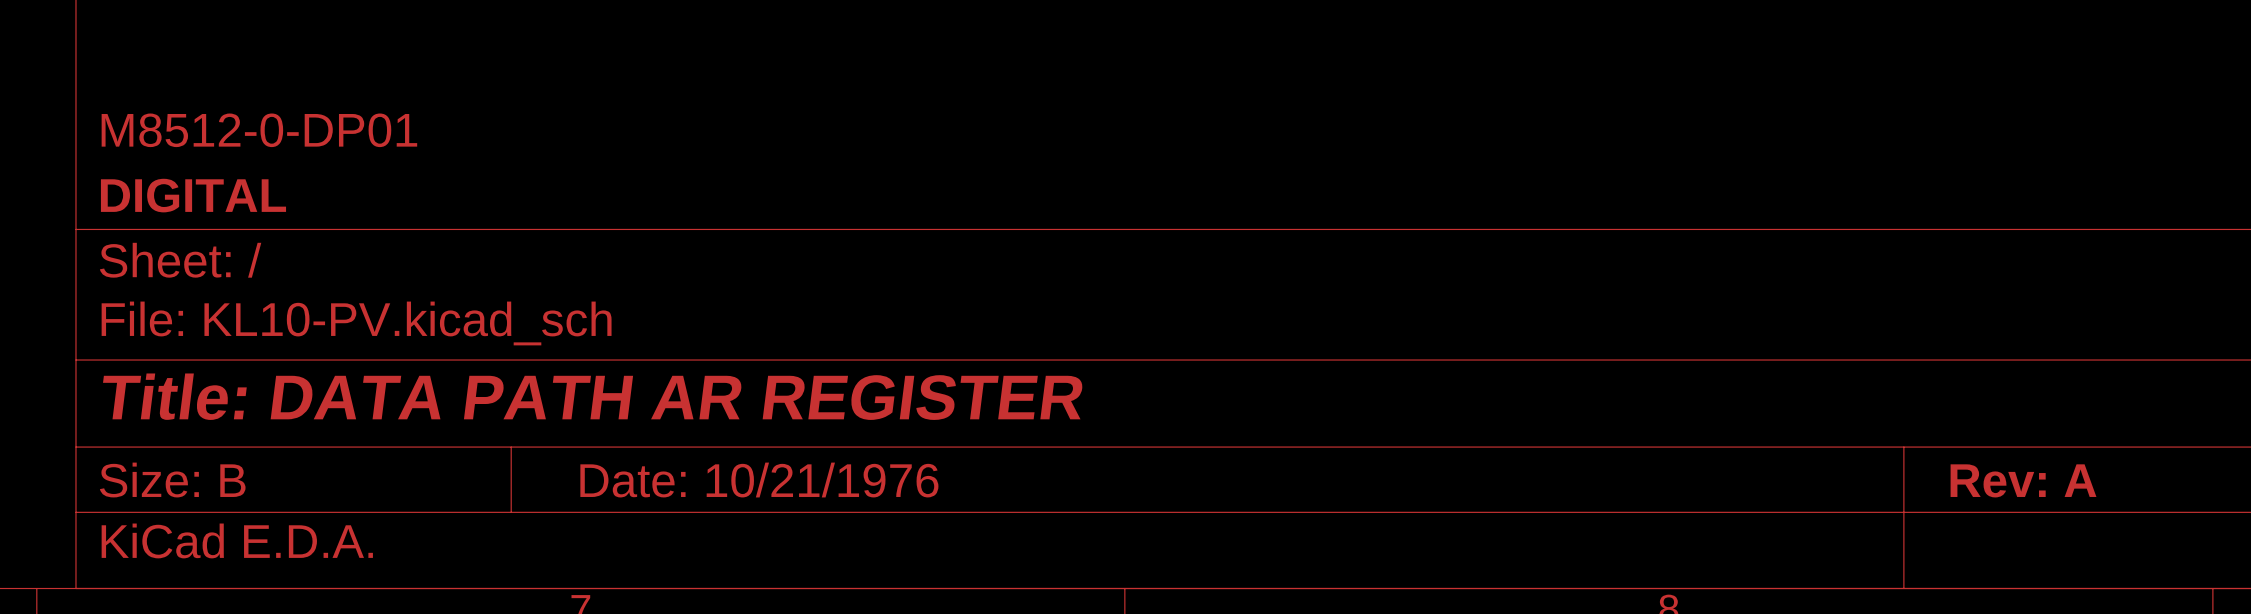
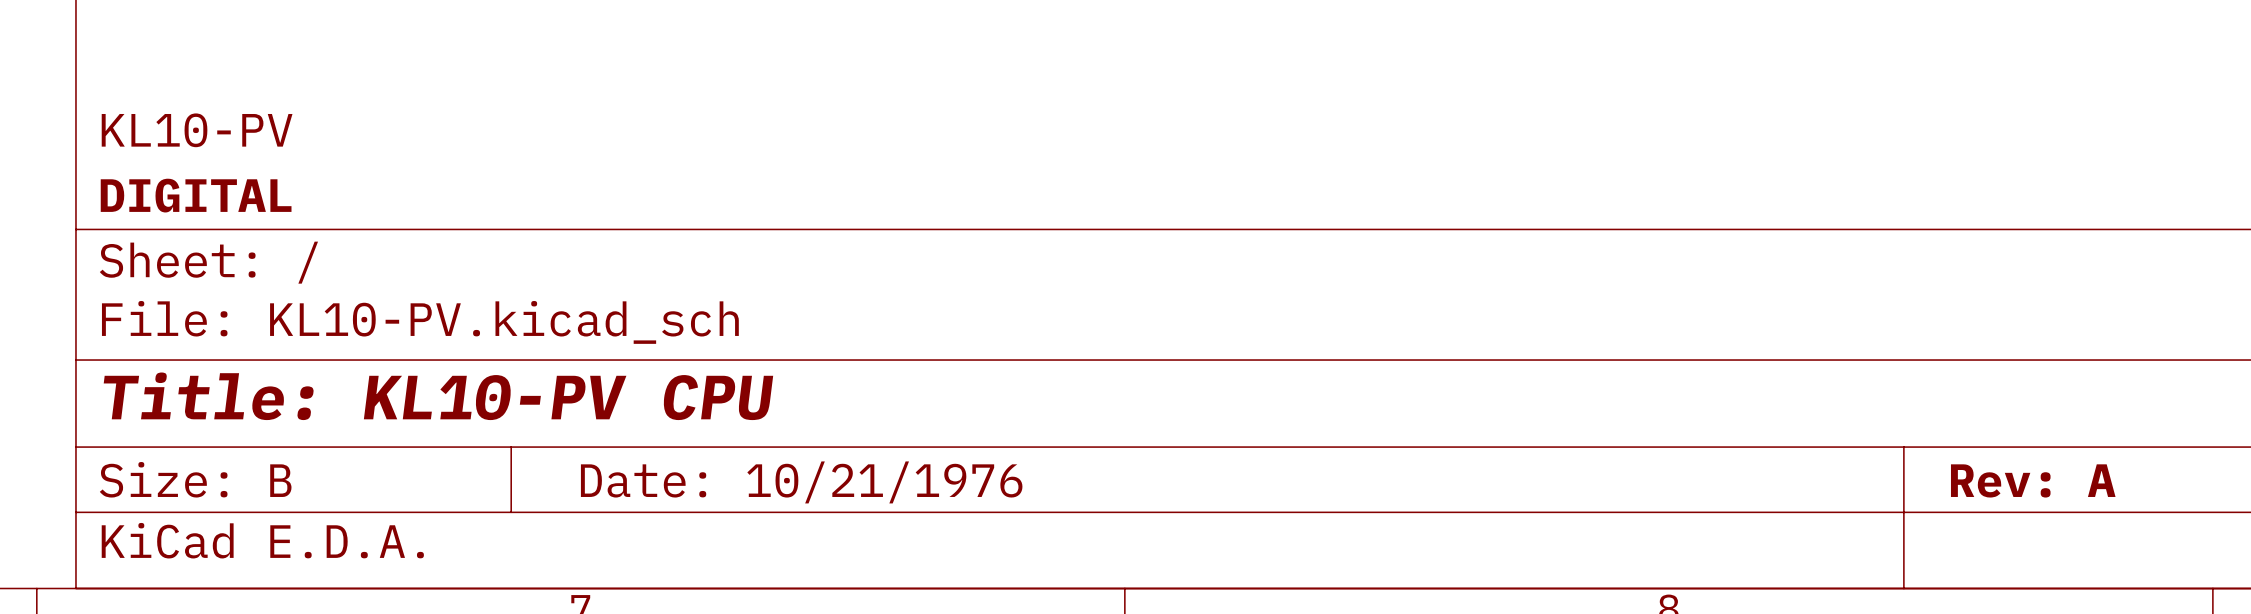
title block: M8512-0-DP01 (259, 130) -> KL10-PV (197, 130)
title block: Title: DATA PATH AR REGISTER (592, 396) -> Title: KL10-PV CPU (438, 396)

